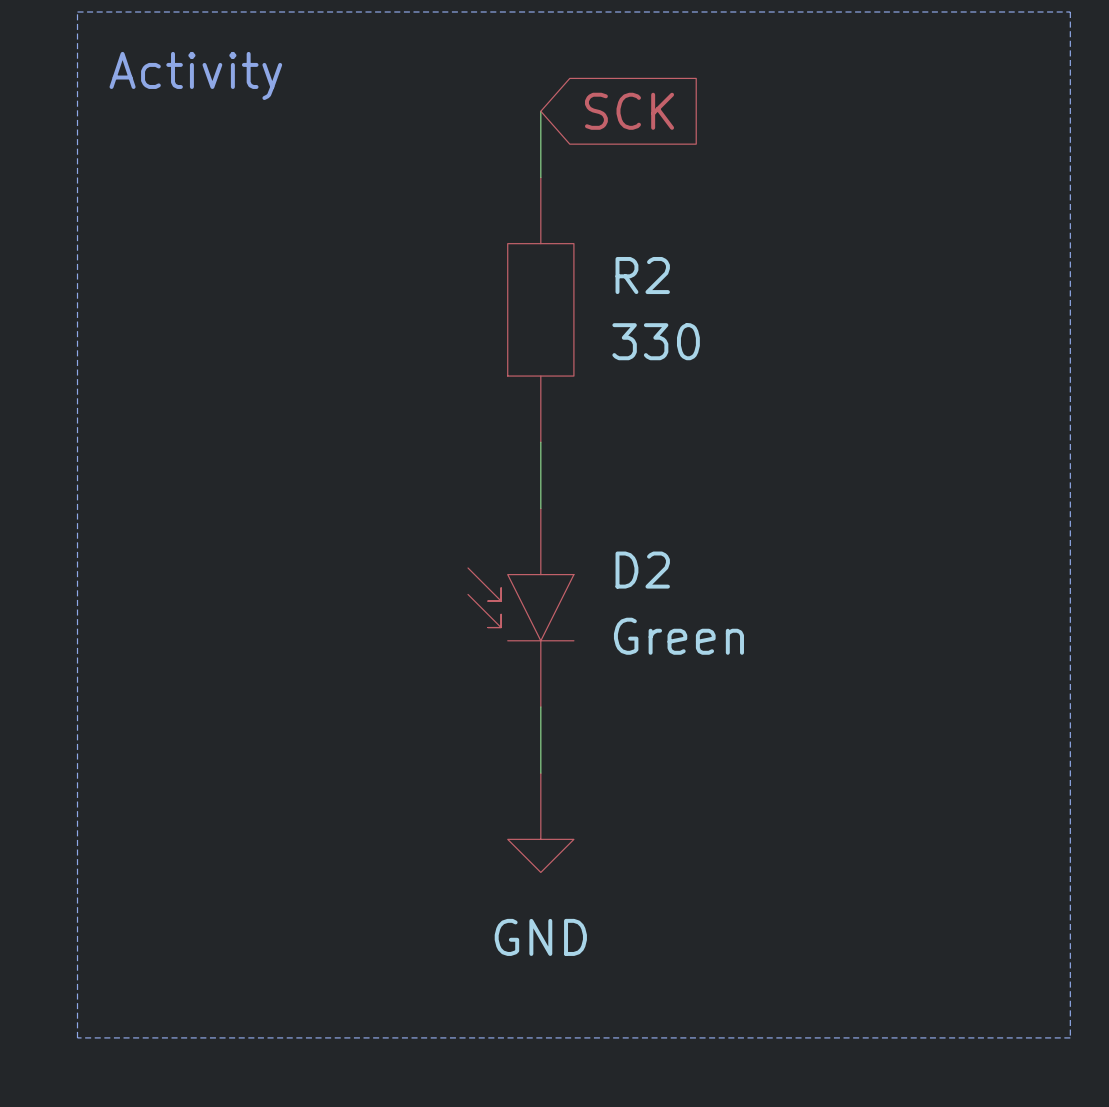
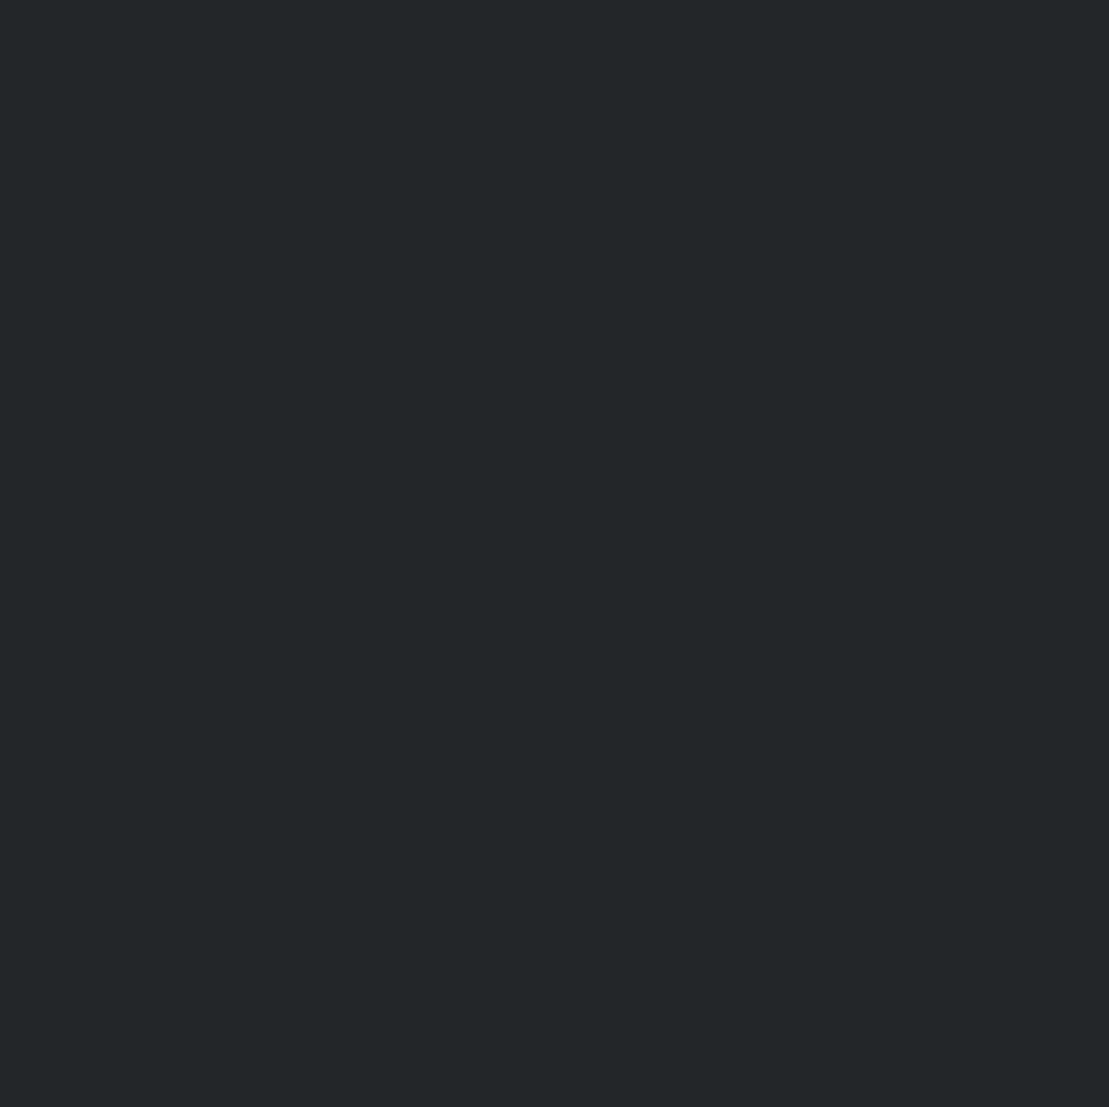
line: (77, 11) (1070, 11) (1070, 1037) (77, 1037) (77, 11) -> none
text: Activity (195, 75) -> none
wire: (540, 111) (540, 177) -> none
global label: SCK (629, 111) -> none
R2: 330 (540, 309) -> none
wire: (540, 442) (540, 508) -> none
D2: Green (520, 607) -> none
wire: (540, 706) (540, 773) -> none
power symbol: GND (540, 822) -> none

